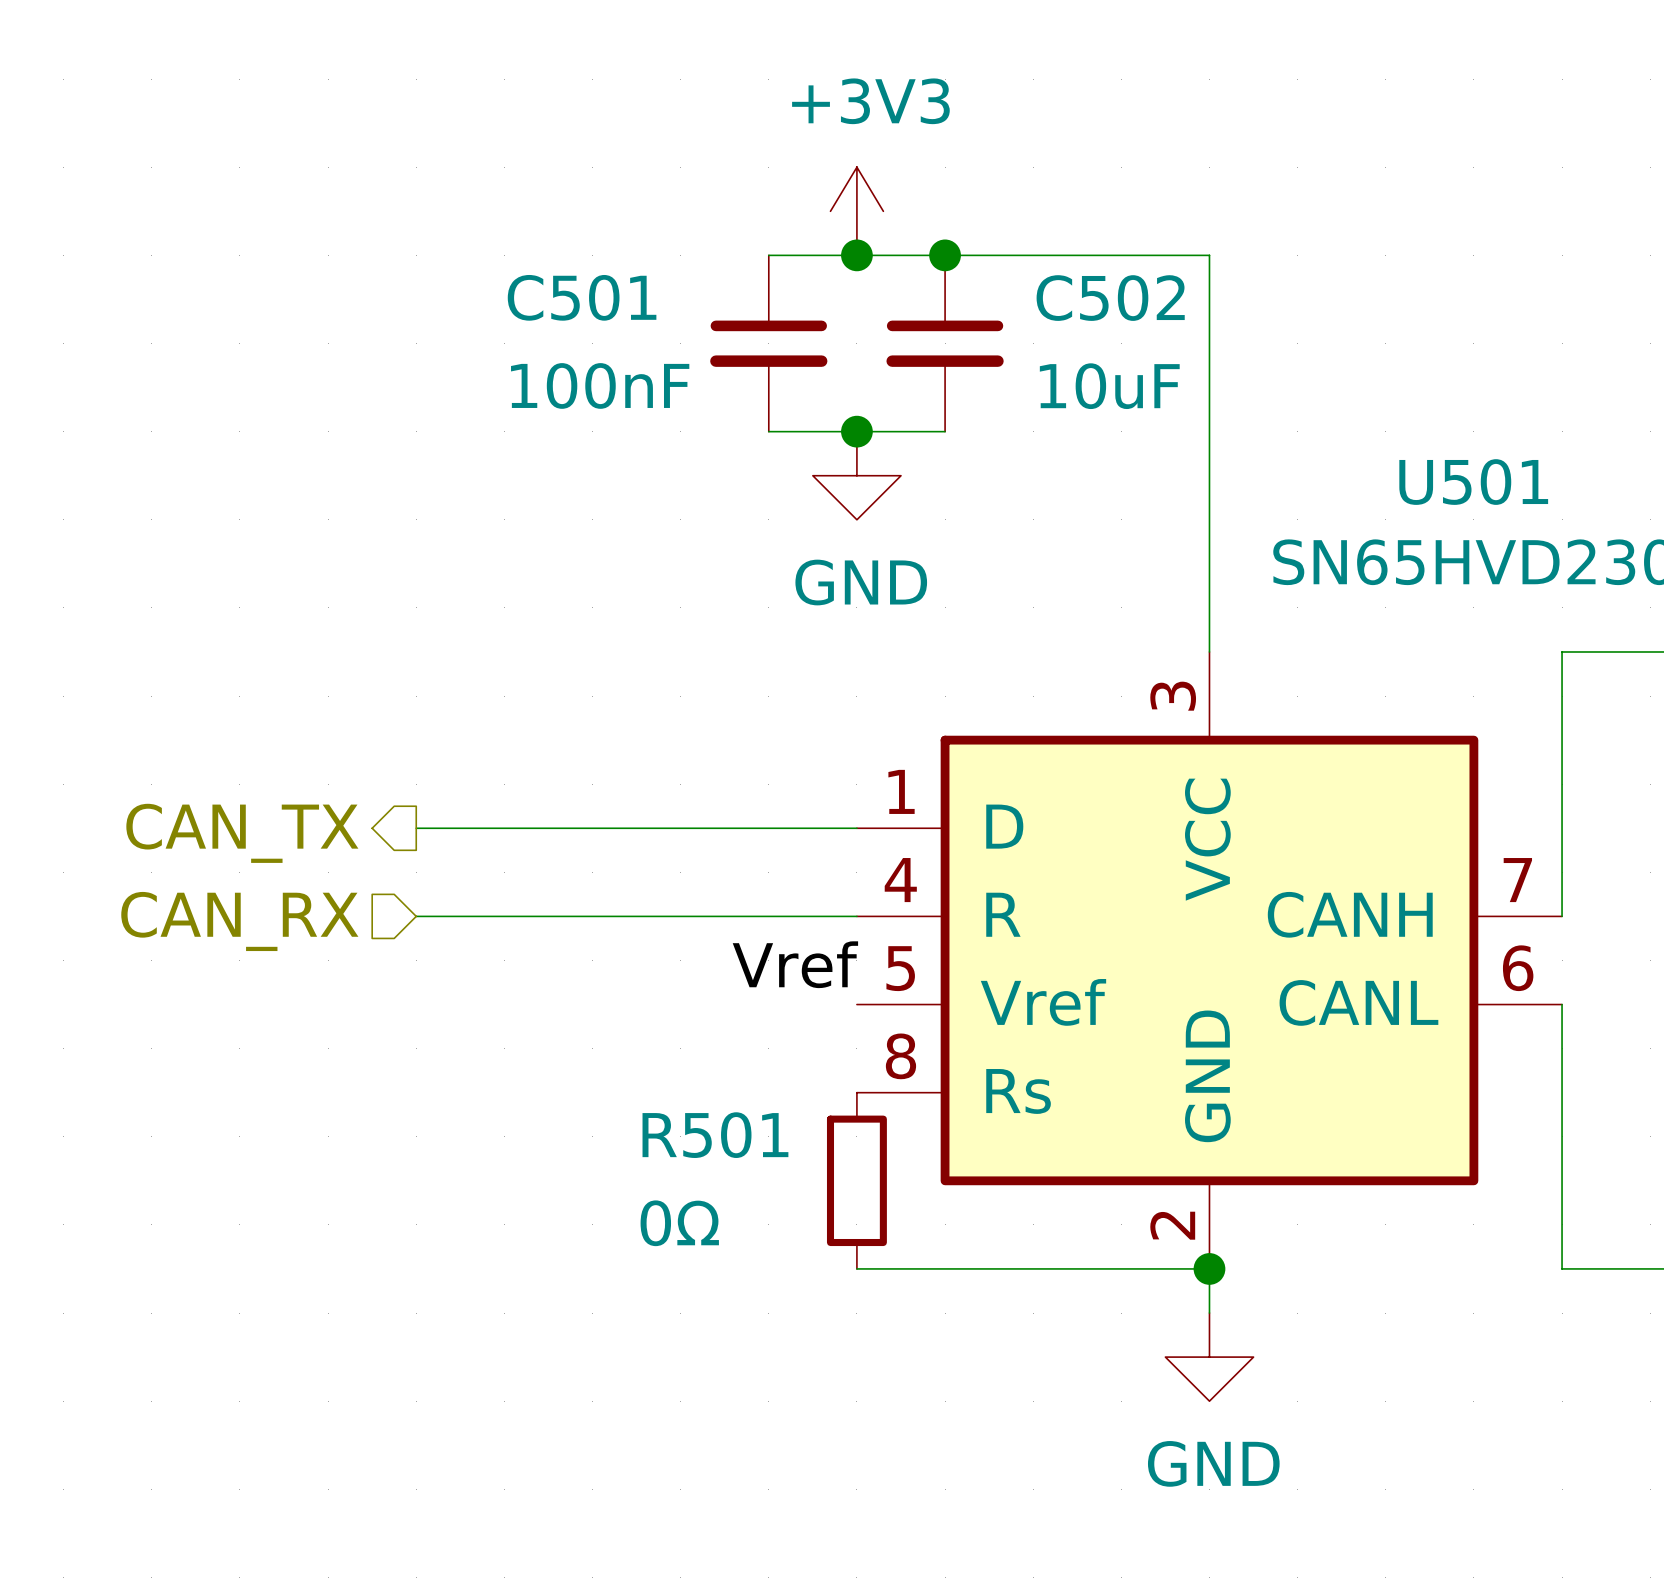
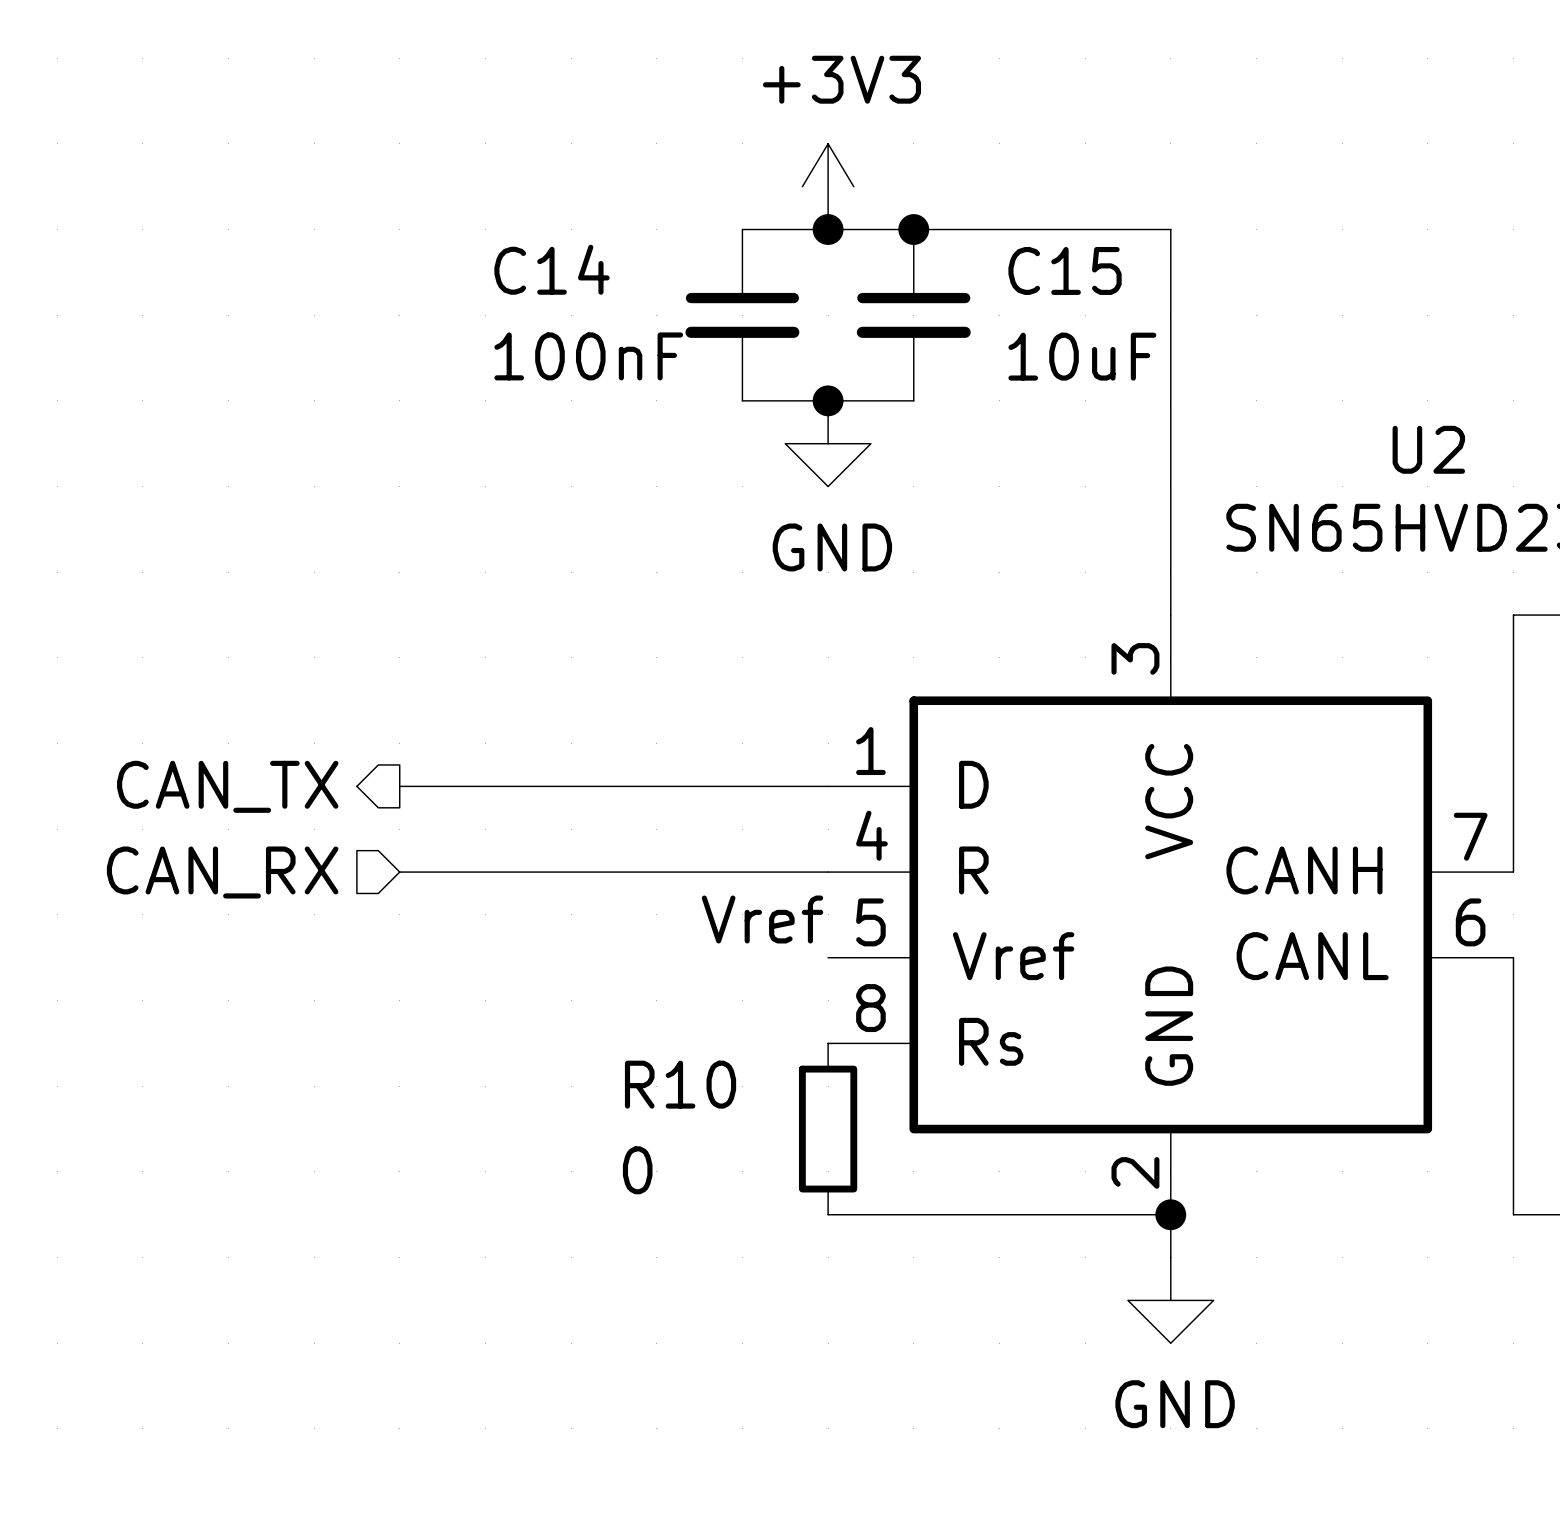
C501 name: C501 (582, 297) -> C14 (552, 269)
C502 name: C502 (1110, 298) -> C15 (1065, 270)
U501 name: U501 (1473, 482) -> U2 (1428, 449)
R501 name: R501 (715, 1135) -> R10 (680, 1084)
R501 value: 0Ω (679, 1223) -> 0 (637, 1170)

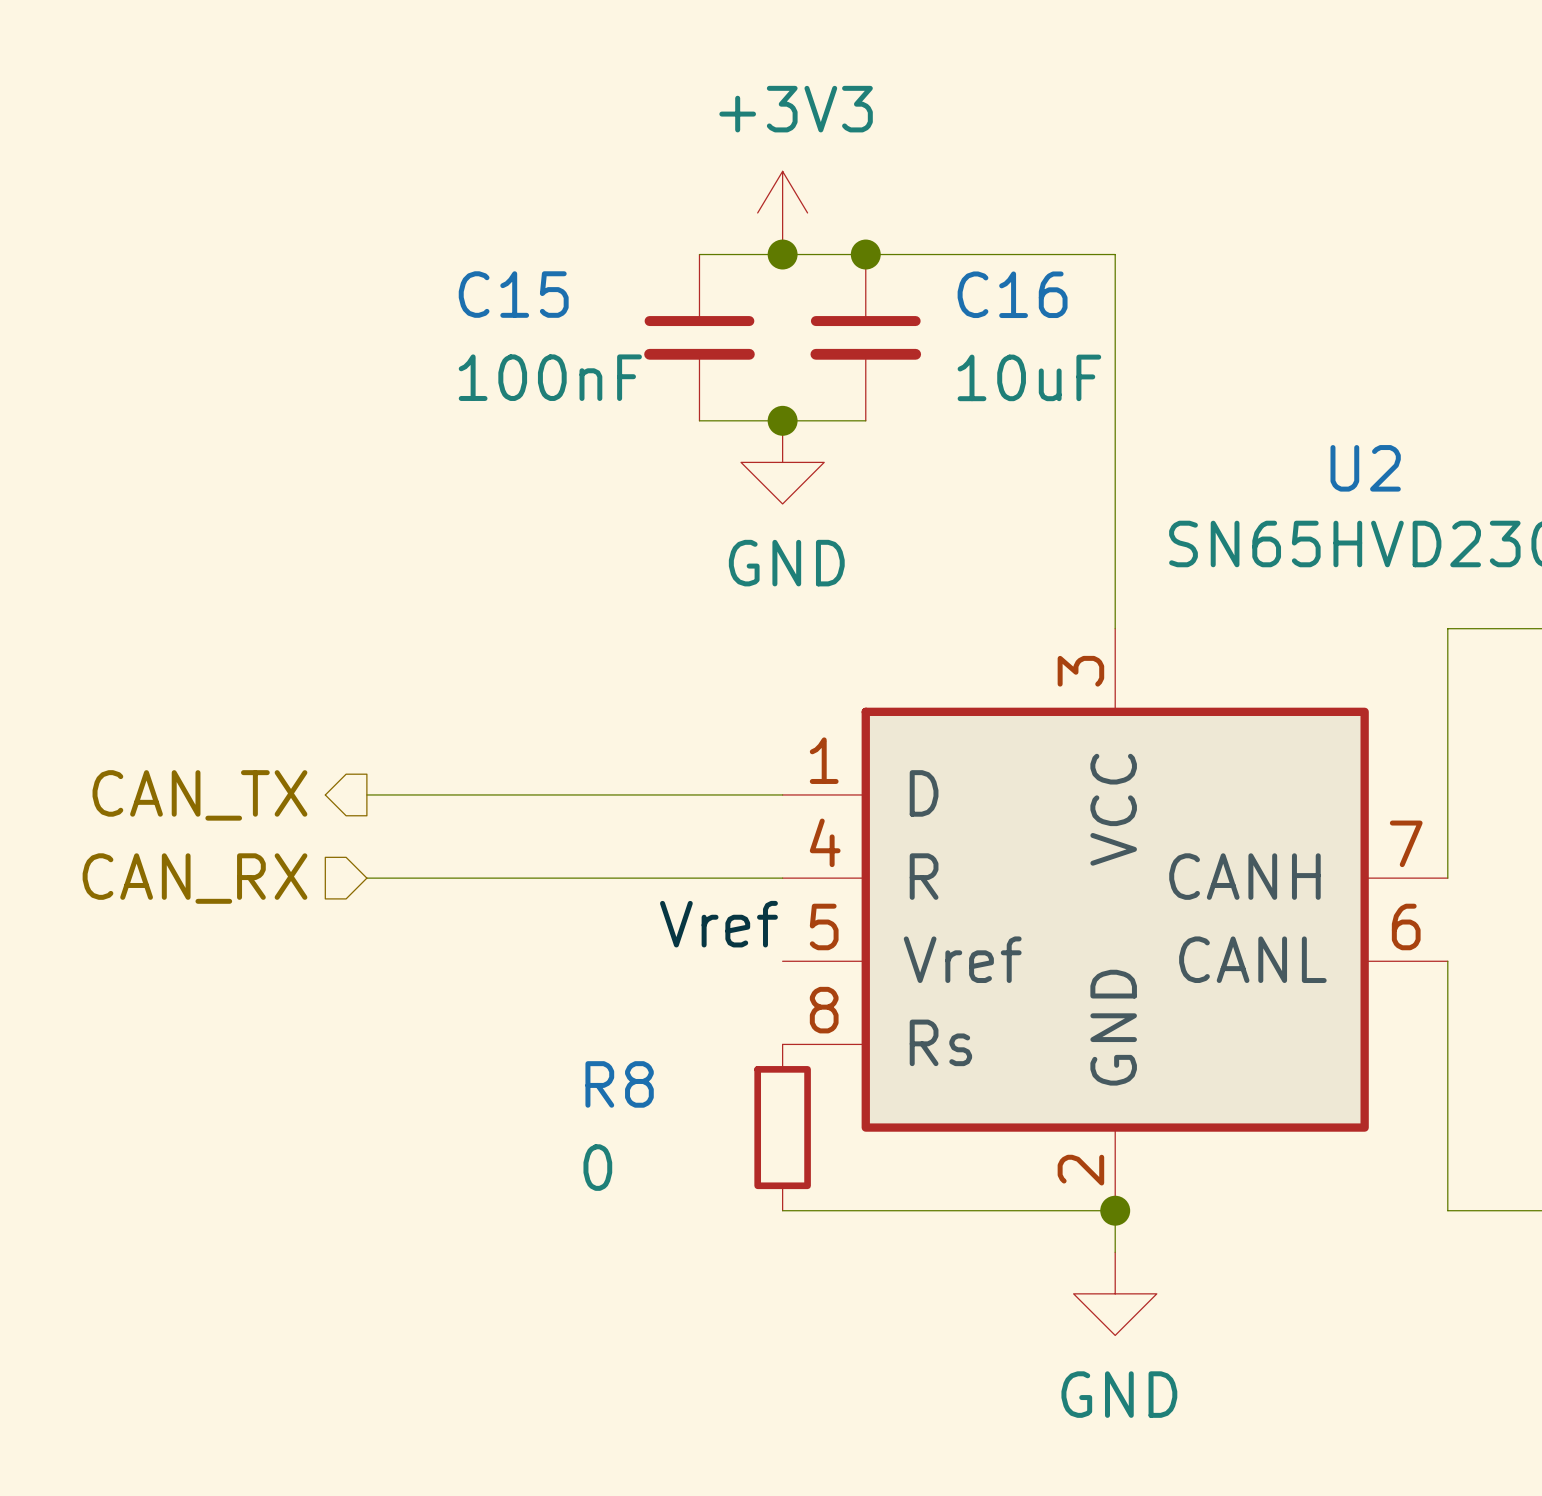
C14 name: C14 (552, 269) -> C15 (513, 294)
C15 name: C15 (1065, 270) -> C16 (1012, 294)
R10 name: R10 (680, 1084) -> R8 (619, 1084)

